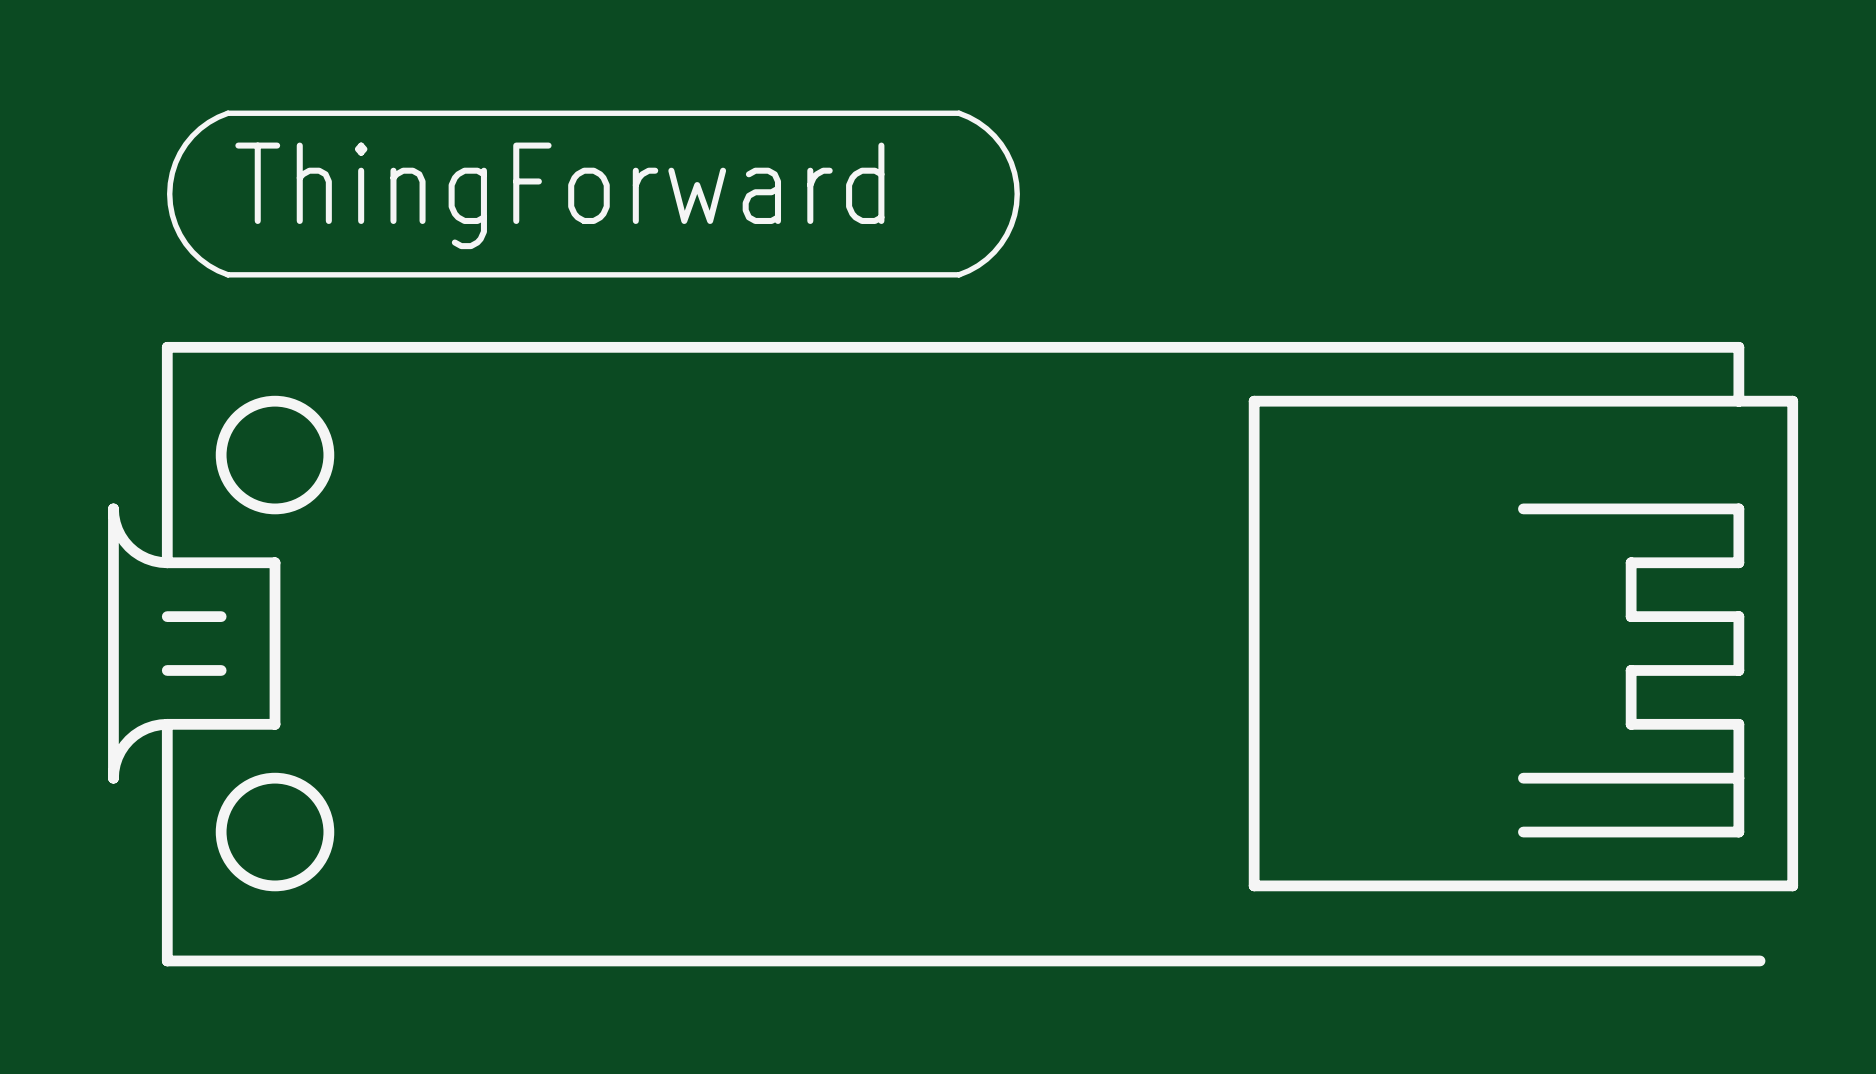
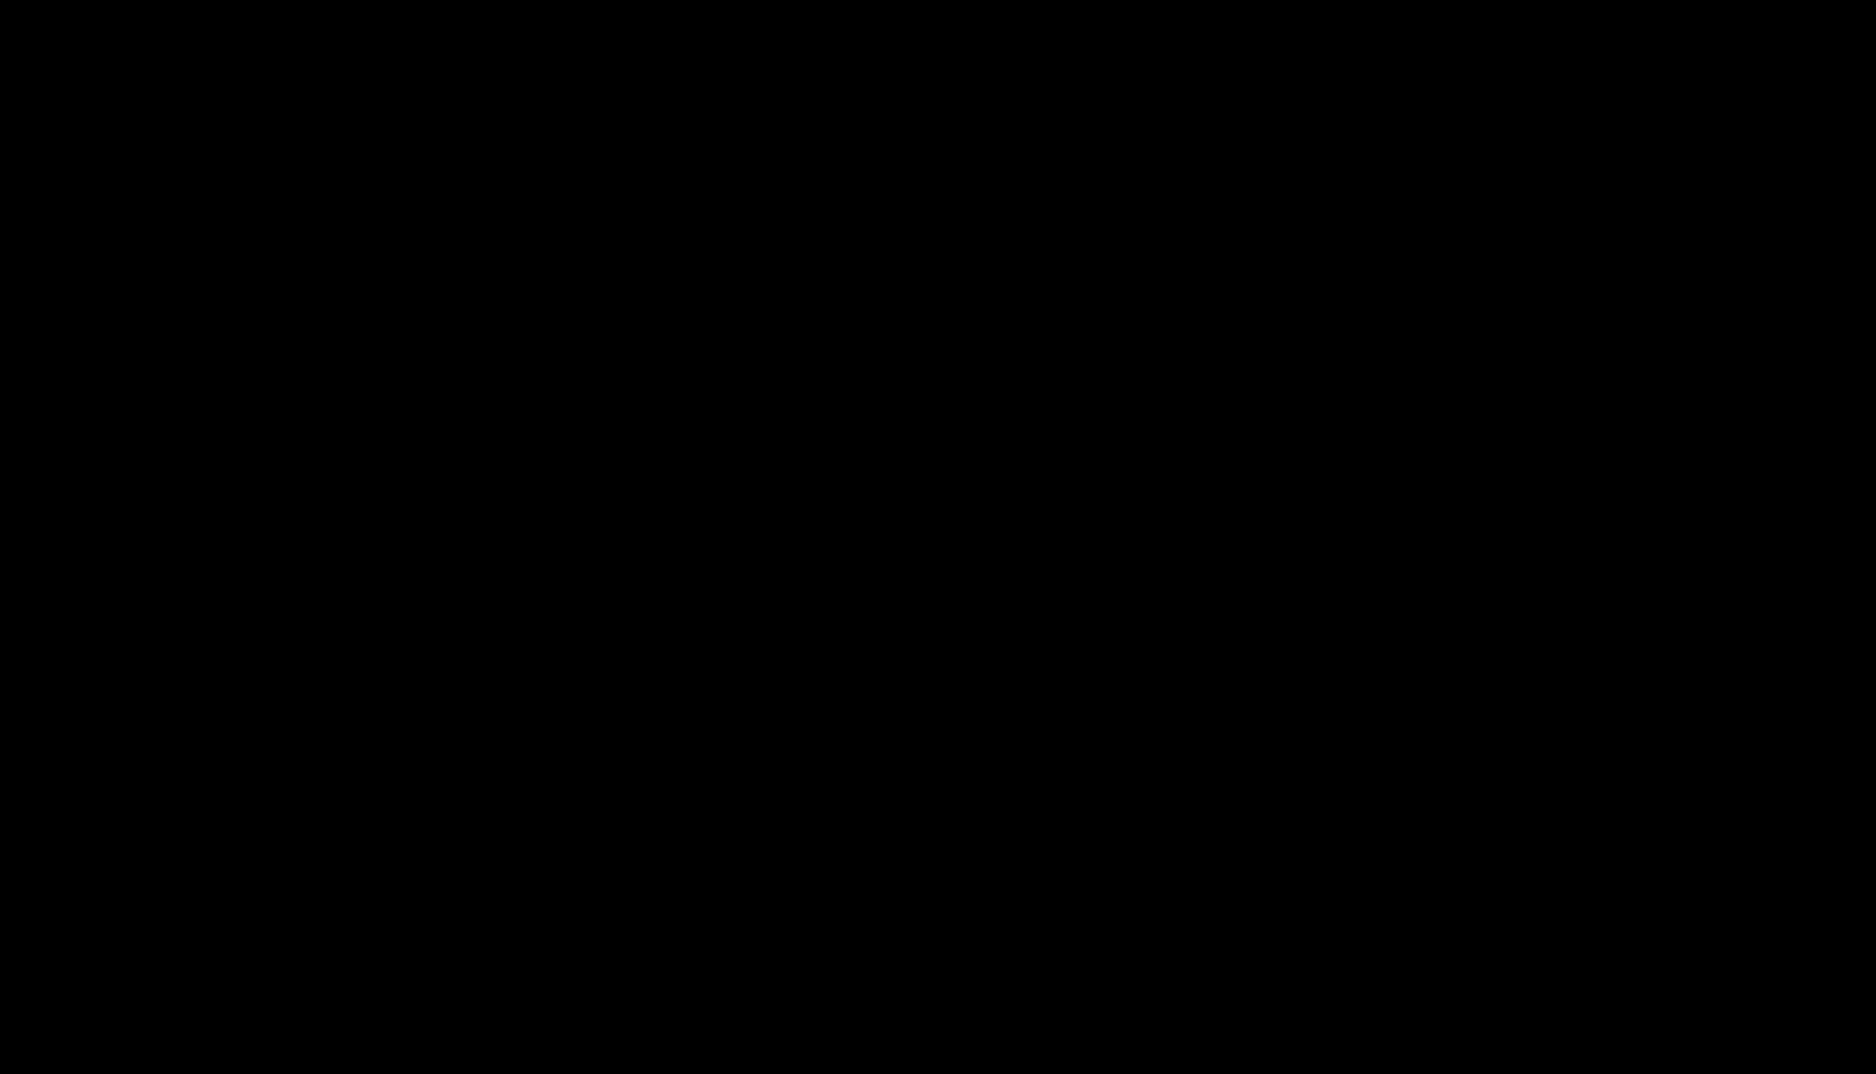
line: (227, 113) (959, 113) (986, 128) (1006, 153) (1016, 183) (1016, 204) (1011, 225) (1001, 243) (986, 259) (959, 274) (227, 274) (200, 259) (185, 243) (175, 225) (169, 194) (175, 162) (185, 144) (200, 128) (227, 113) -> none
text: ThingForward (559, 195) -> none
drawing: [215, 395, 335, 515] -> none
line: (1254, 401) (1792, 401) (1792, 885) (1254, 885) (1254, 401) -> none
line: (1738, 401) (1738, 347) (167, 347) (167, 562) -> none
line: (1523, 508) (1738, 508) (1738, 562) (1631, 562) (1631, 616) (1738, 616) (1738, 670) (1631, 670) (1631, 724) (1738, 724) (1738, 832) (1523, 832) -> none
line: (167, 562) (275, 562) (275, 724) (167, 724) -> none
line: (167, 562) (146, 558) (129, 546) (117, 529) (113, 508) (113, 778) (117, 757) (129, 740) (146, 728) (167, 724) -> none
line: (167, 616) (221, 616) -> none
line: (167, 670) (221, 670) -> none
line: (167, 724) (167, 960) (1760, 960) -> none
drawing: [215, 772, 335, 892] -> none
line: (1523, 778) (1738, 778) -> none

